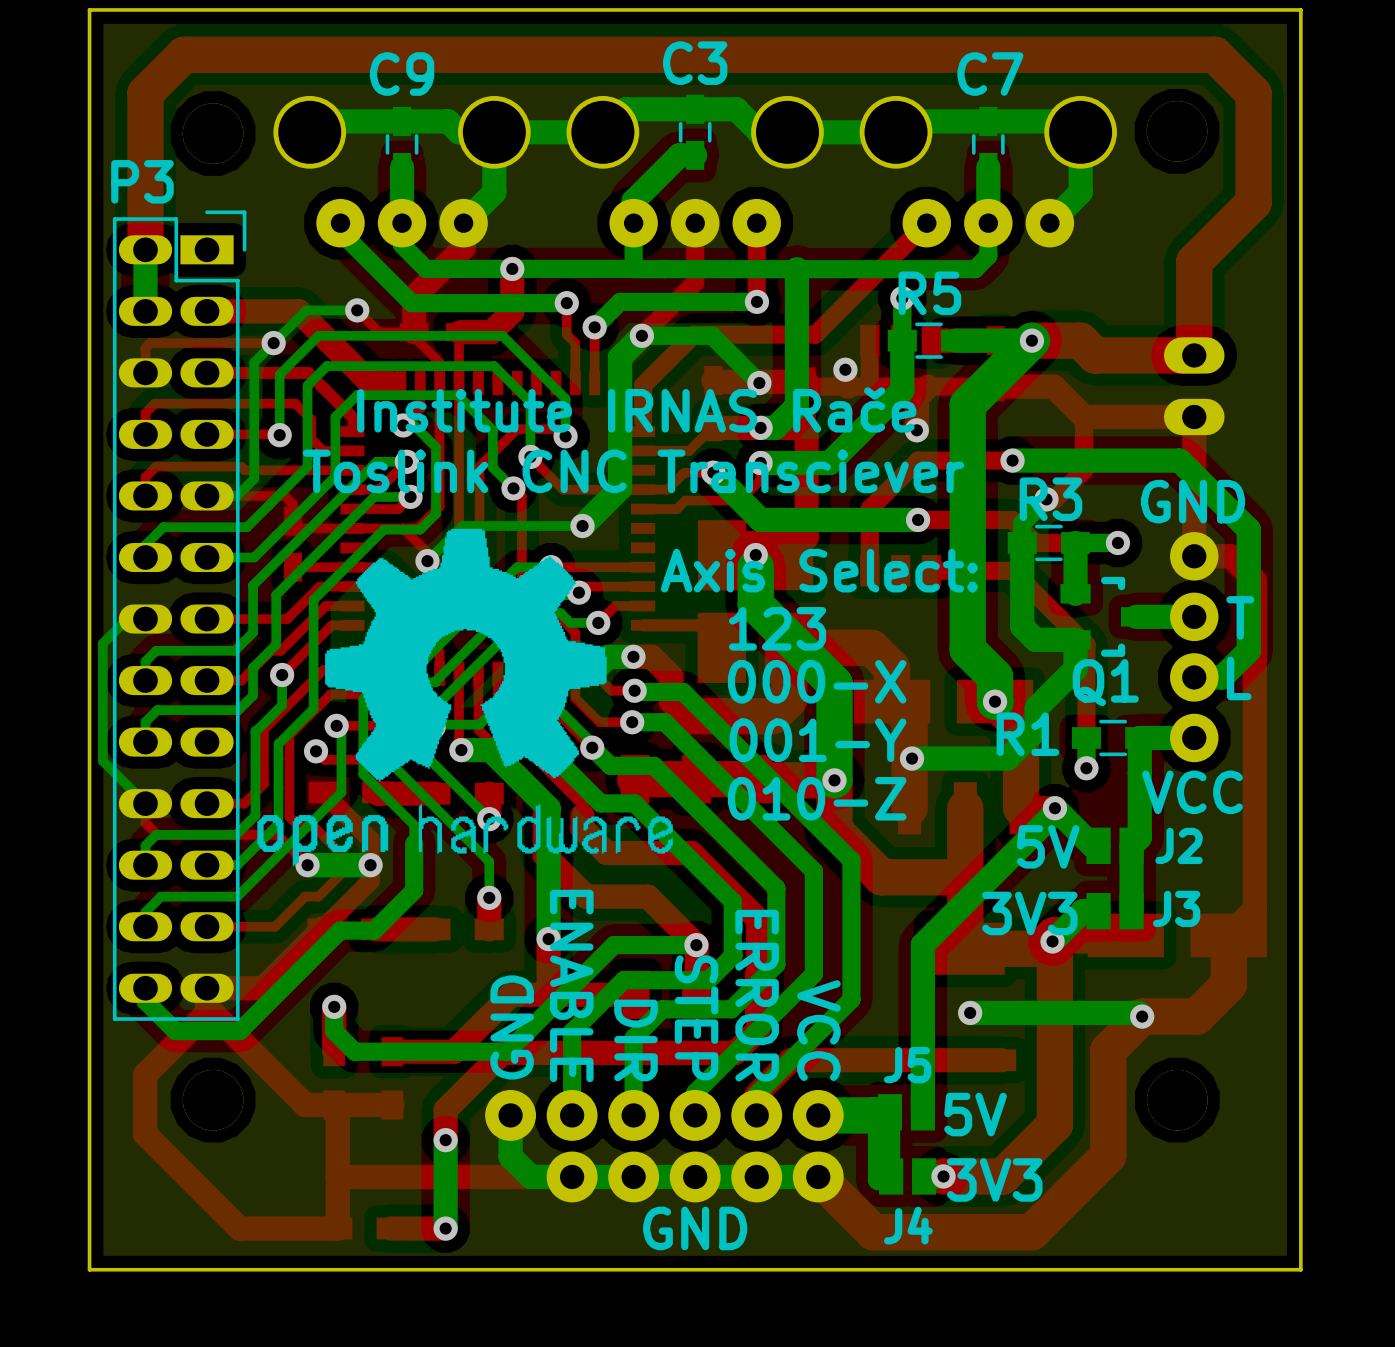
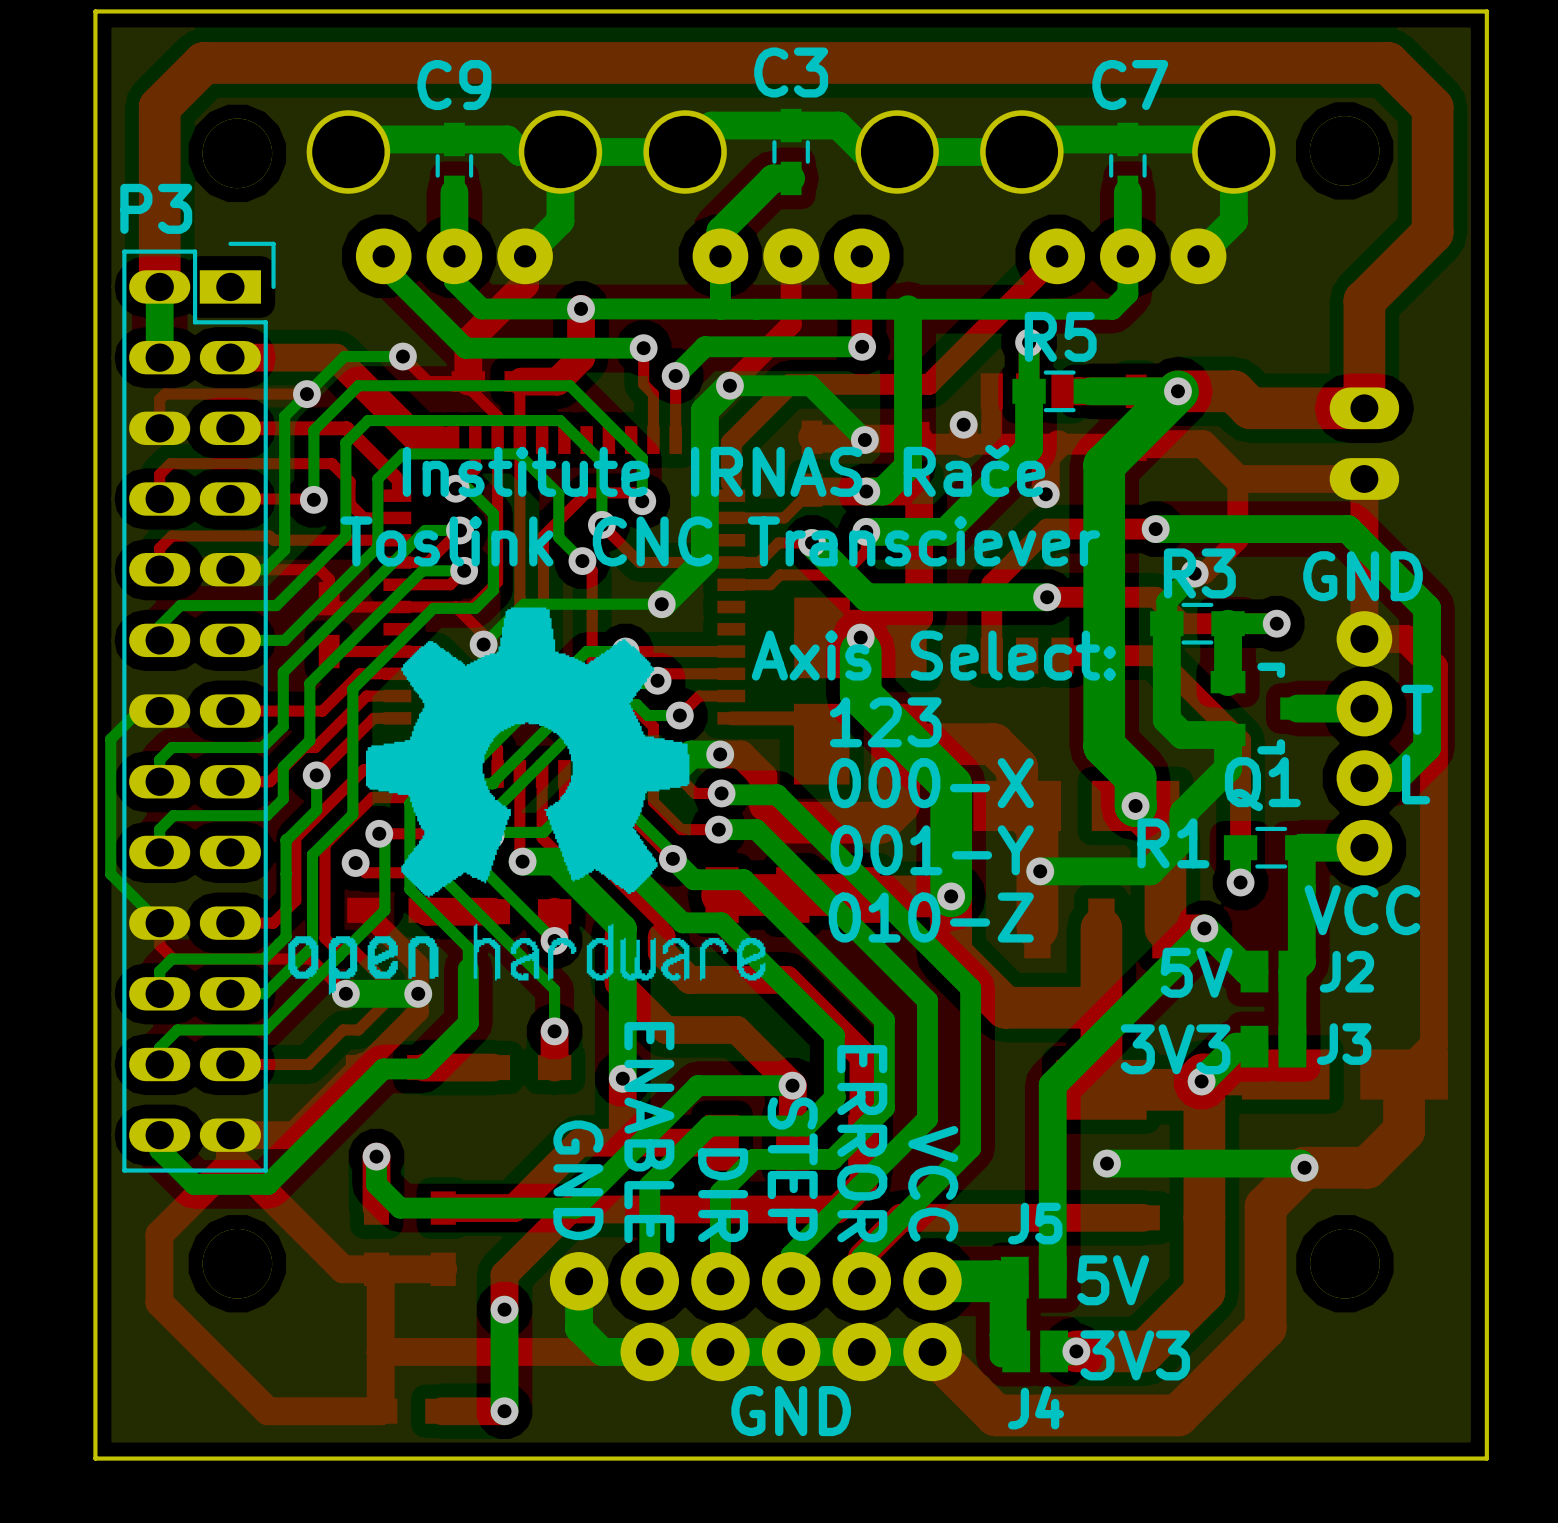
text rotation: 0° (512, 1027) -> 180° (578, 1180)

